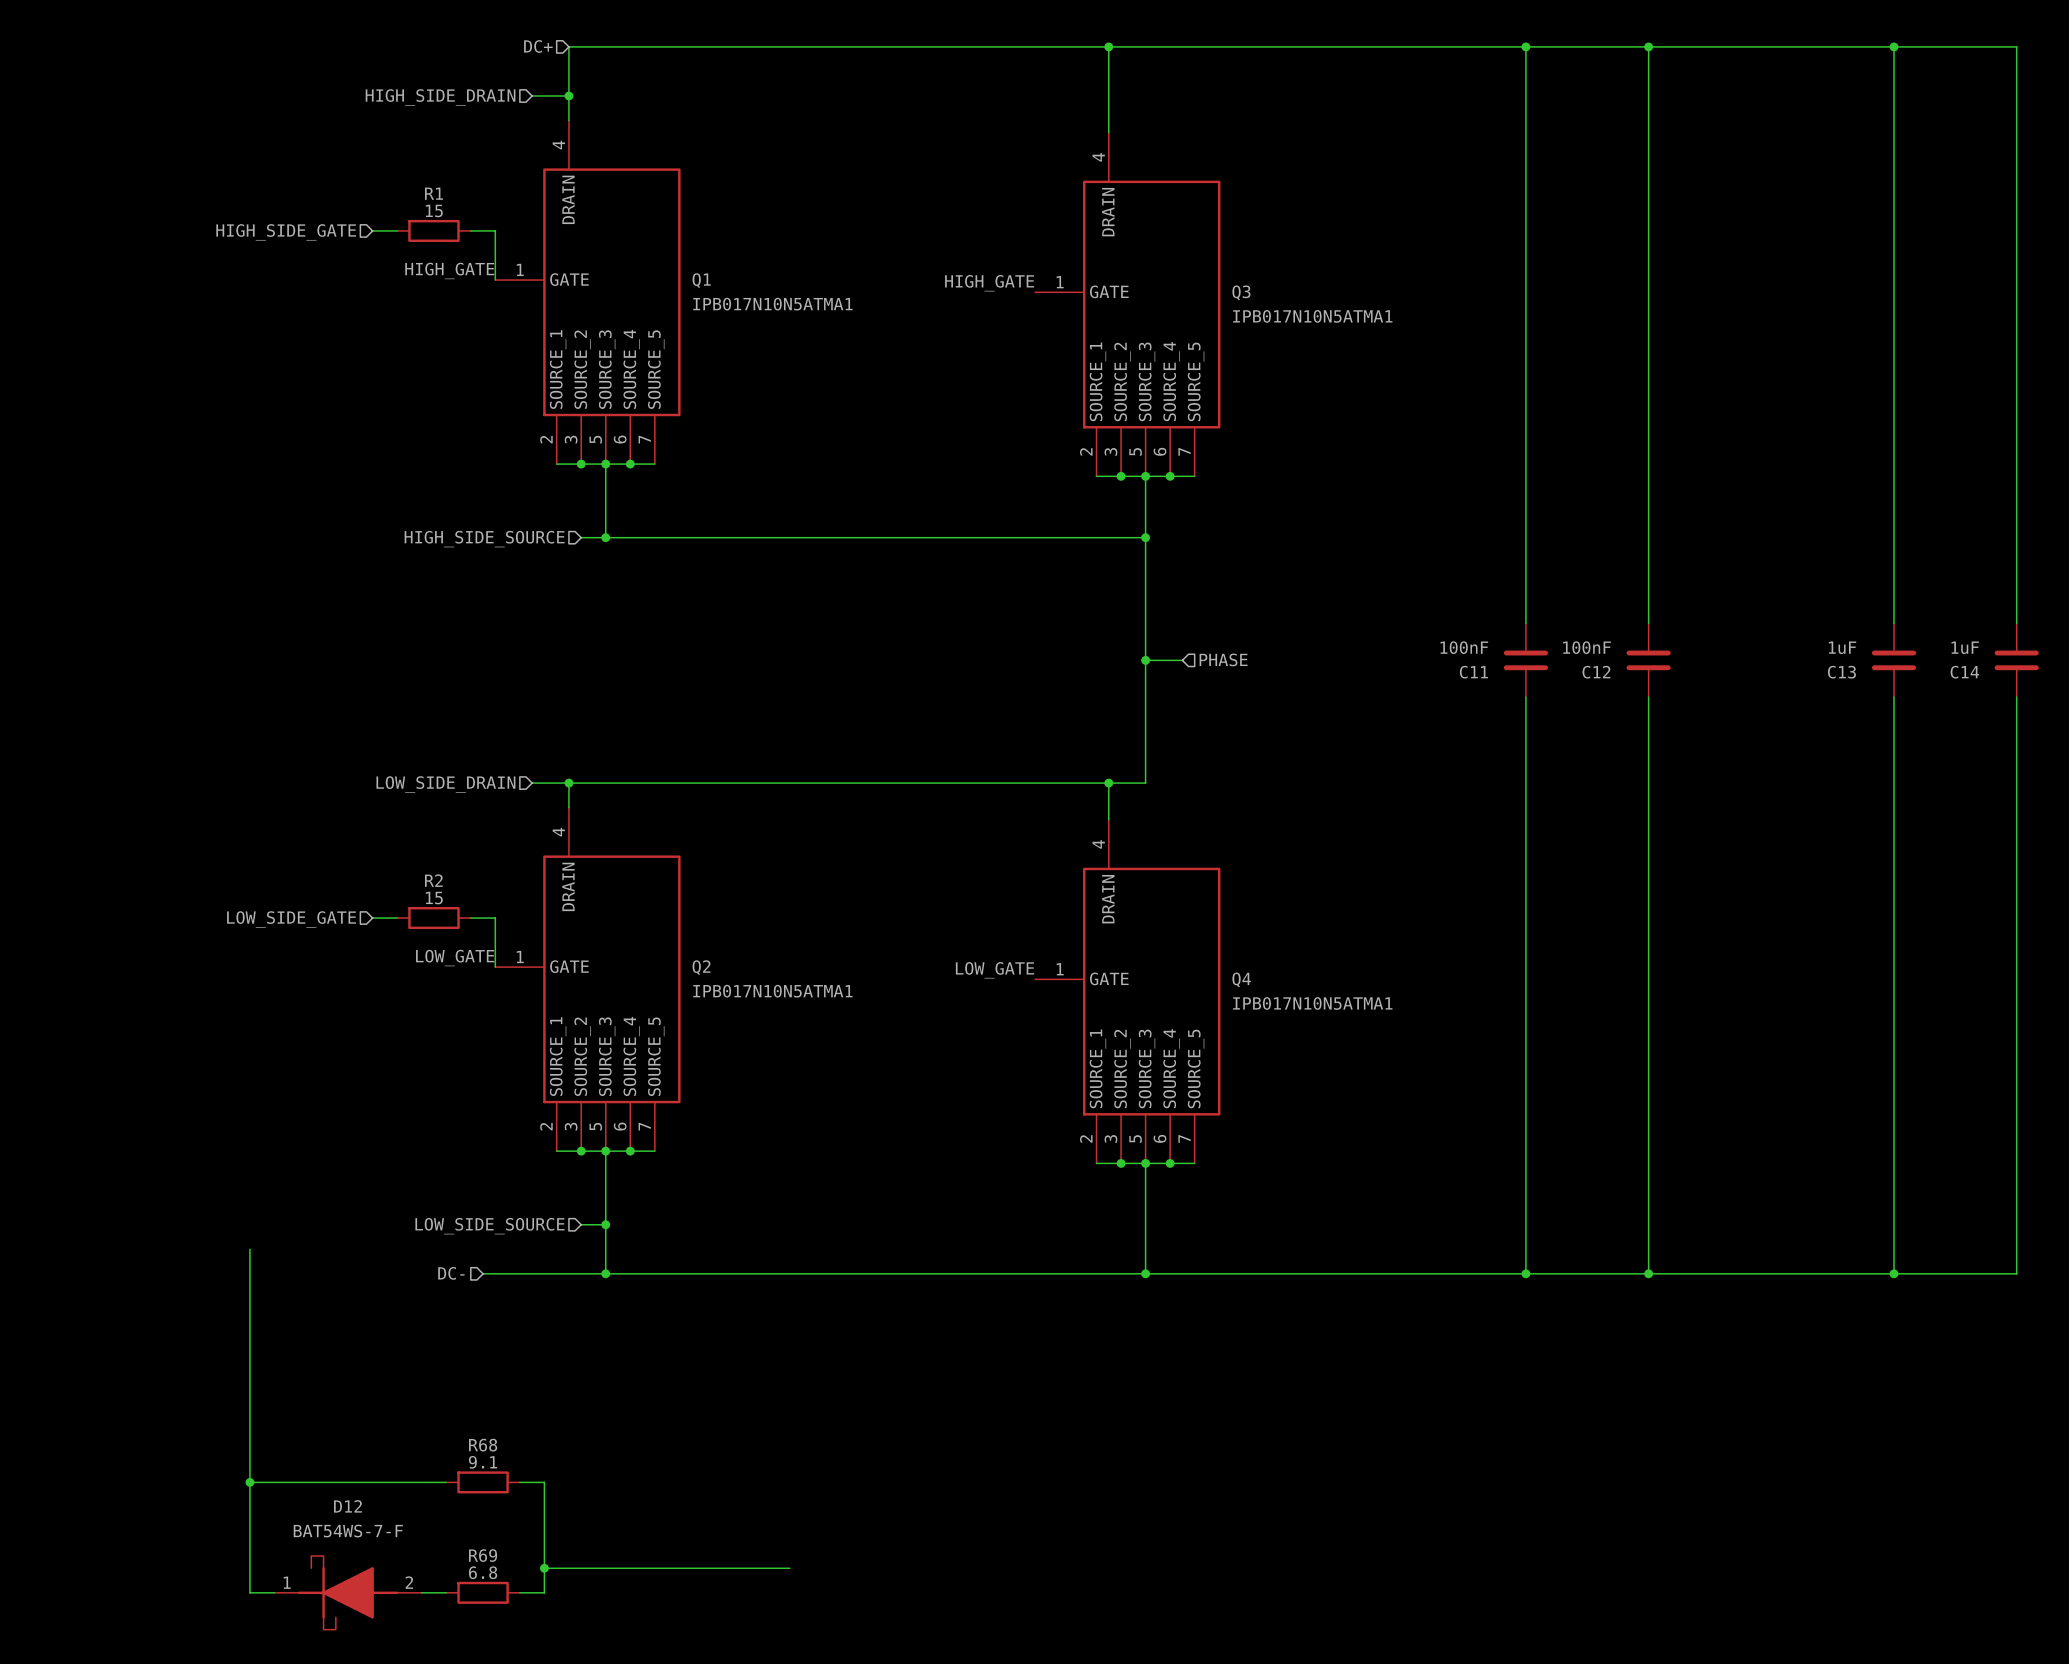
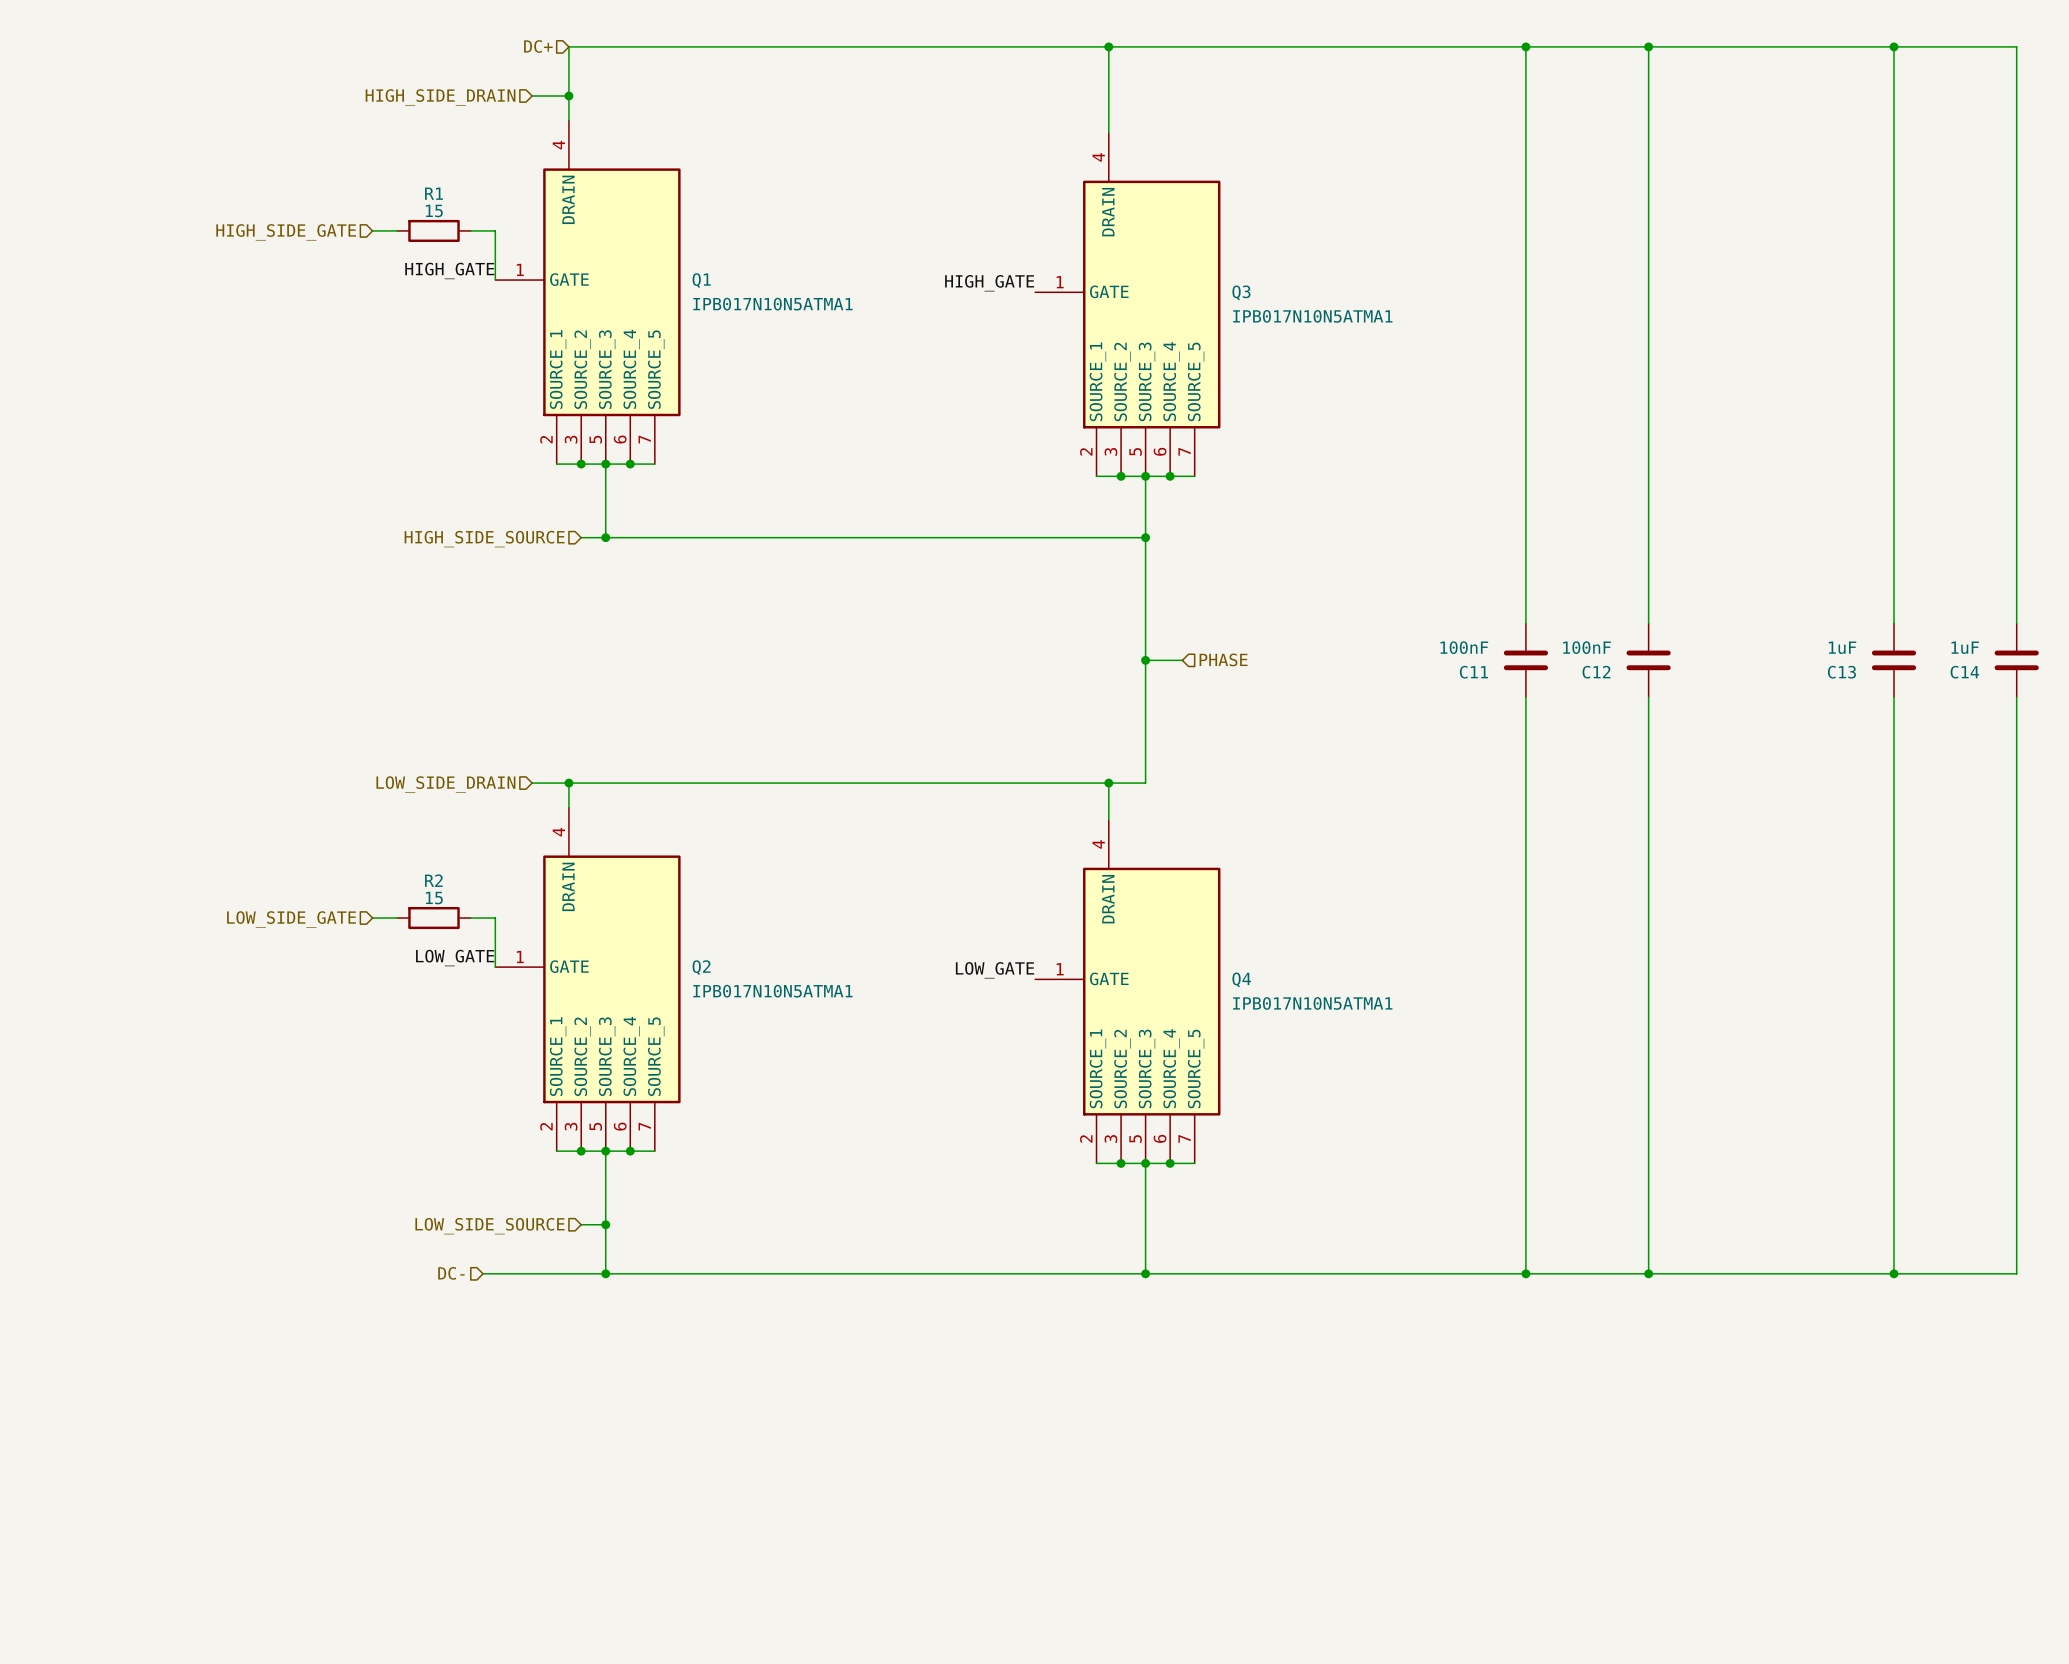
wire: (249, 1249) (249, 1592) (274, 1592) -> none
wire: (249, 1482) (446, 1482) -> none
junction: (249, 1482) -> none
R68: 9.1 (483, 1482) -> none
wire: (519, 1482) (544, 1482) (544, 1592) (519, 1592) -> none
wire: (544, 1568) (789, 1568) -> none
junction: (544, 1568) -> none
D12: BAT54WS-7-F (348, 1592) -> none
wire: (421, 1592) (446, 1592) -> none
R69: 6.8 (483, 1592) -> none

